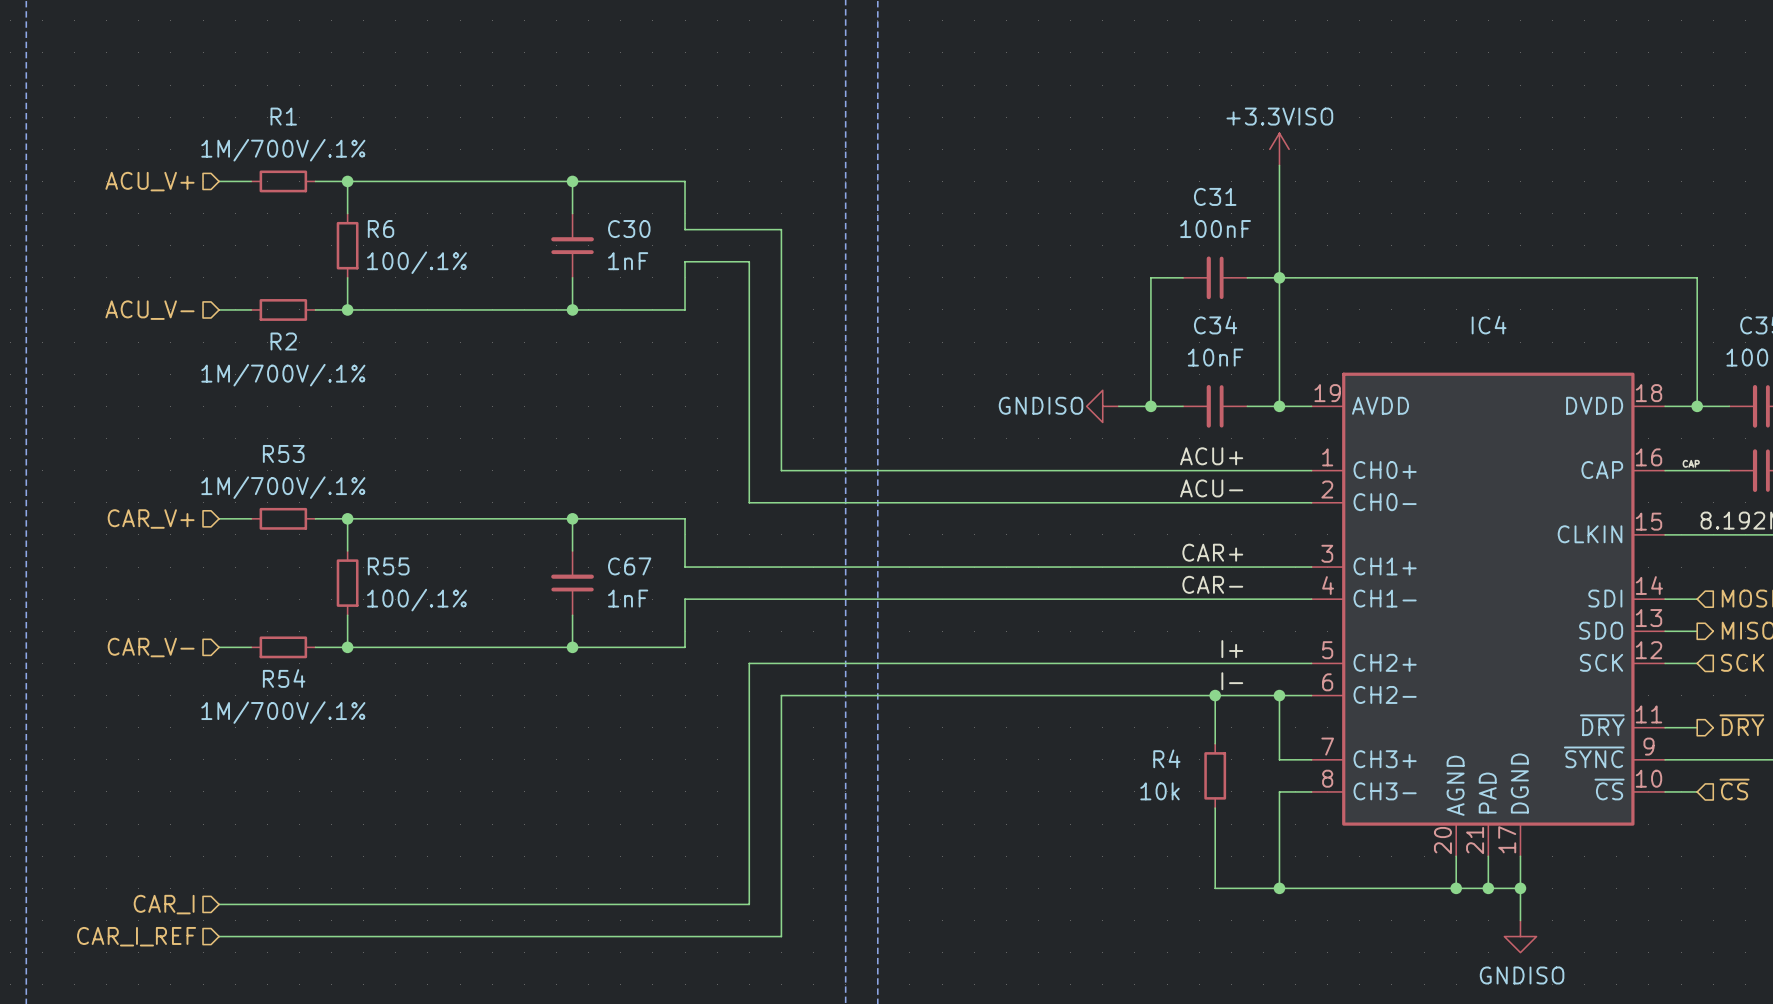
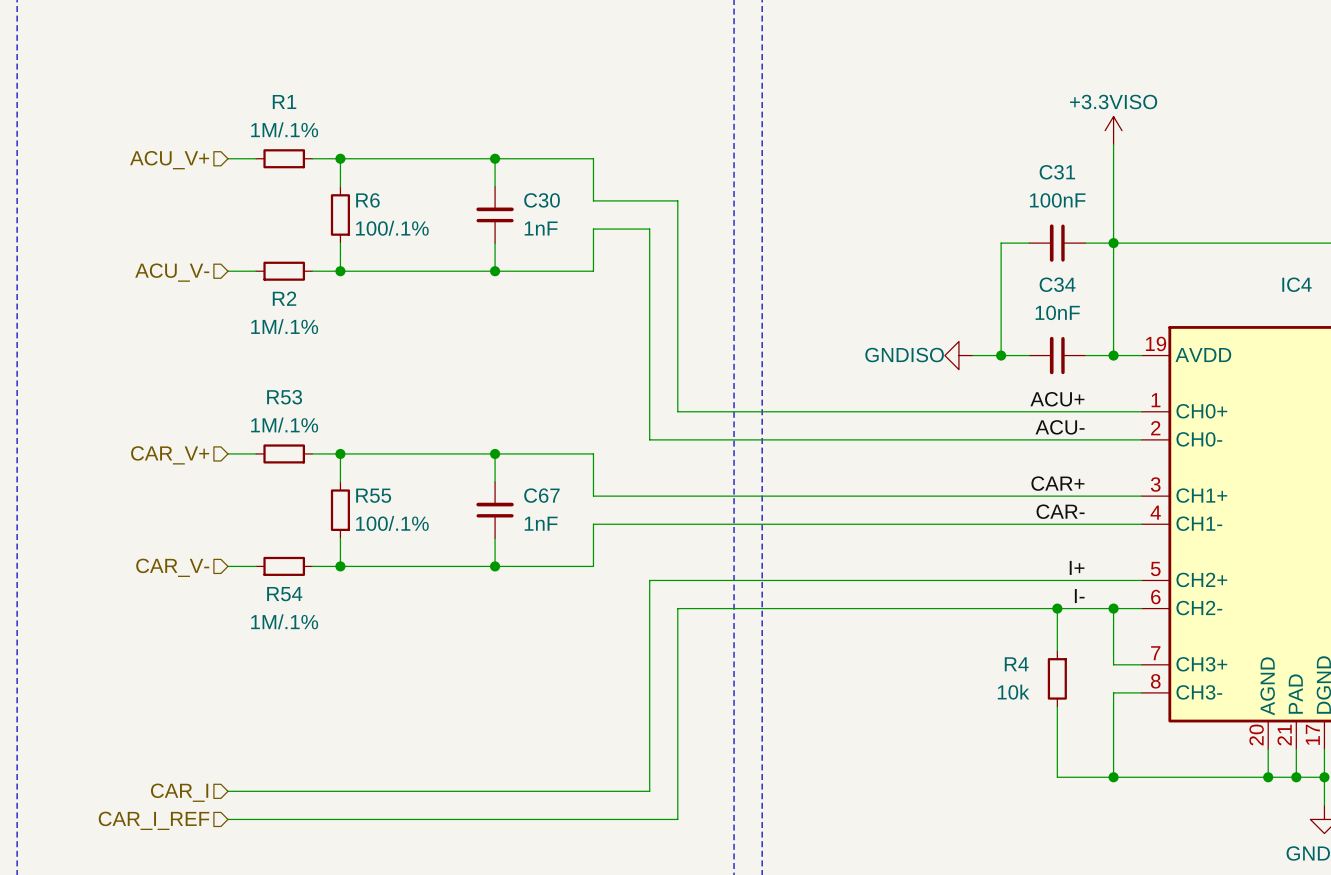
R1 value: 1M/700V/.1% (283, 150) -> 1M/.1% (284, 129)
hierarchical label position: ACU_V+ (149, 181) -> ACU_V+ (169, 160)
wire: (219, 181) (251, 181) -> (227, 158) (256, 158)
R1 position: (283, 181) -> (284, 158)
wire: (315, 181) (363, 181) -> none
wire: (347, 181) (347, 213) -> (340, 158) (340, 186)
junction position: (347, 181) -> (340, 158)
R6 position: (347, 245) -> (340, 214)
wire: (347, 277) (347, 309) -> (340, 243) (340, 271)
wire: (219, 309) (251, 309) -> (227, 271) (256, 271)
R2 position: (283, 309) -> (284, 271)
wire: (315, 309) (363, 309) -> none
junction position: (347, 309) -> (340, 271)
hierarchical label position: ACU_V- (149, 310) -> ACU_V- (172, 272)
R2 value: 1M/700V/.1% (283, 375) -> 1M/.1% (284, 326)
R53 value: 1M/700V/.1% (283, 487) -> 1M/.1% (284, 425)
wire: (219, 518) (251, 518) -> (227, 453) (256, 453)
R53 position: (283, 518) -> (284, 453)
wire: (315, 518) (363, 518) -> none
wire: (347, 518) (347, 550) -> (340, 453) (340, 482)
junction position: (347, 518) -> (340, 453)
hierarchical label position: CAR_V+ (151, 519) -> CAR_V+ (170, 455)
R55 position: (347, 583) -> (340, 510)
wire: (347, 615) (347, 647) -> (340, 538) (340, 566)
hierarchical label position: CAR_V- (151, 647) -> CAR_V- (172, 567)
wire: (219, 647) (251, 647) -> (227, 566) (256, 566)
R54 position: (283, 647) -> (284, 566)
wire: (315, 647) (363, 647) -> none
junction position: (347, 647) -> (340, 566)
R54 value: 1M/700V/.1% (283, 712) -> 1M/.1% (284, 621)
hierarchical label position: CAR_I (164, 904) -> CAR_I (179, 792)
wire: (219, 904) (267, 904) -> none
hierarchical label position: CAR_I_REF (136, 936) -> CAR_I_REF (154, 820)
wire: (219, 936) (267, 936) -> none

